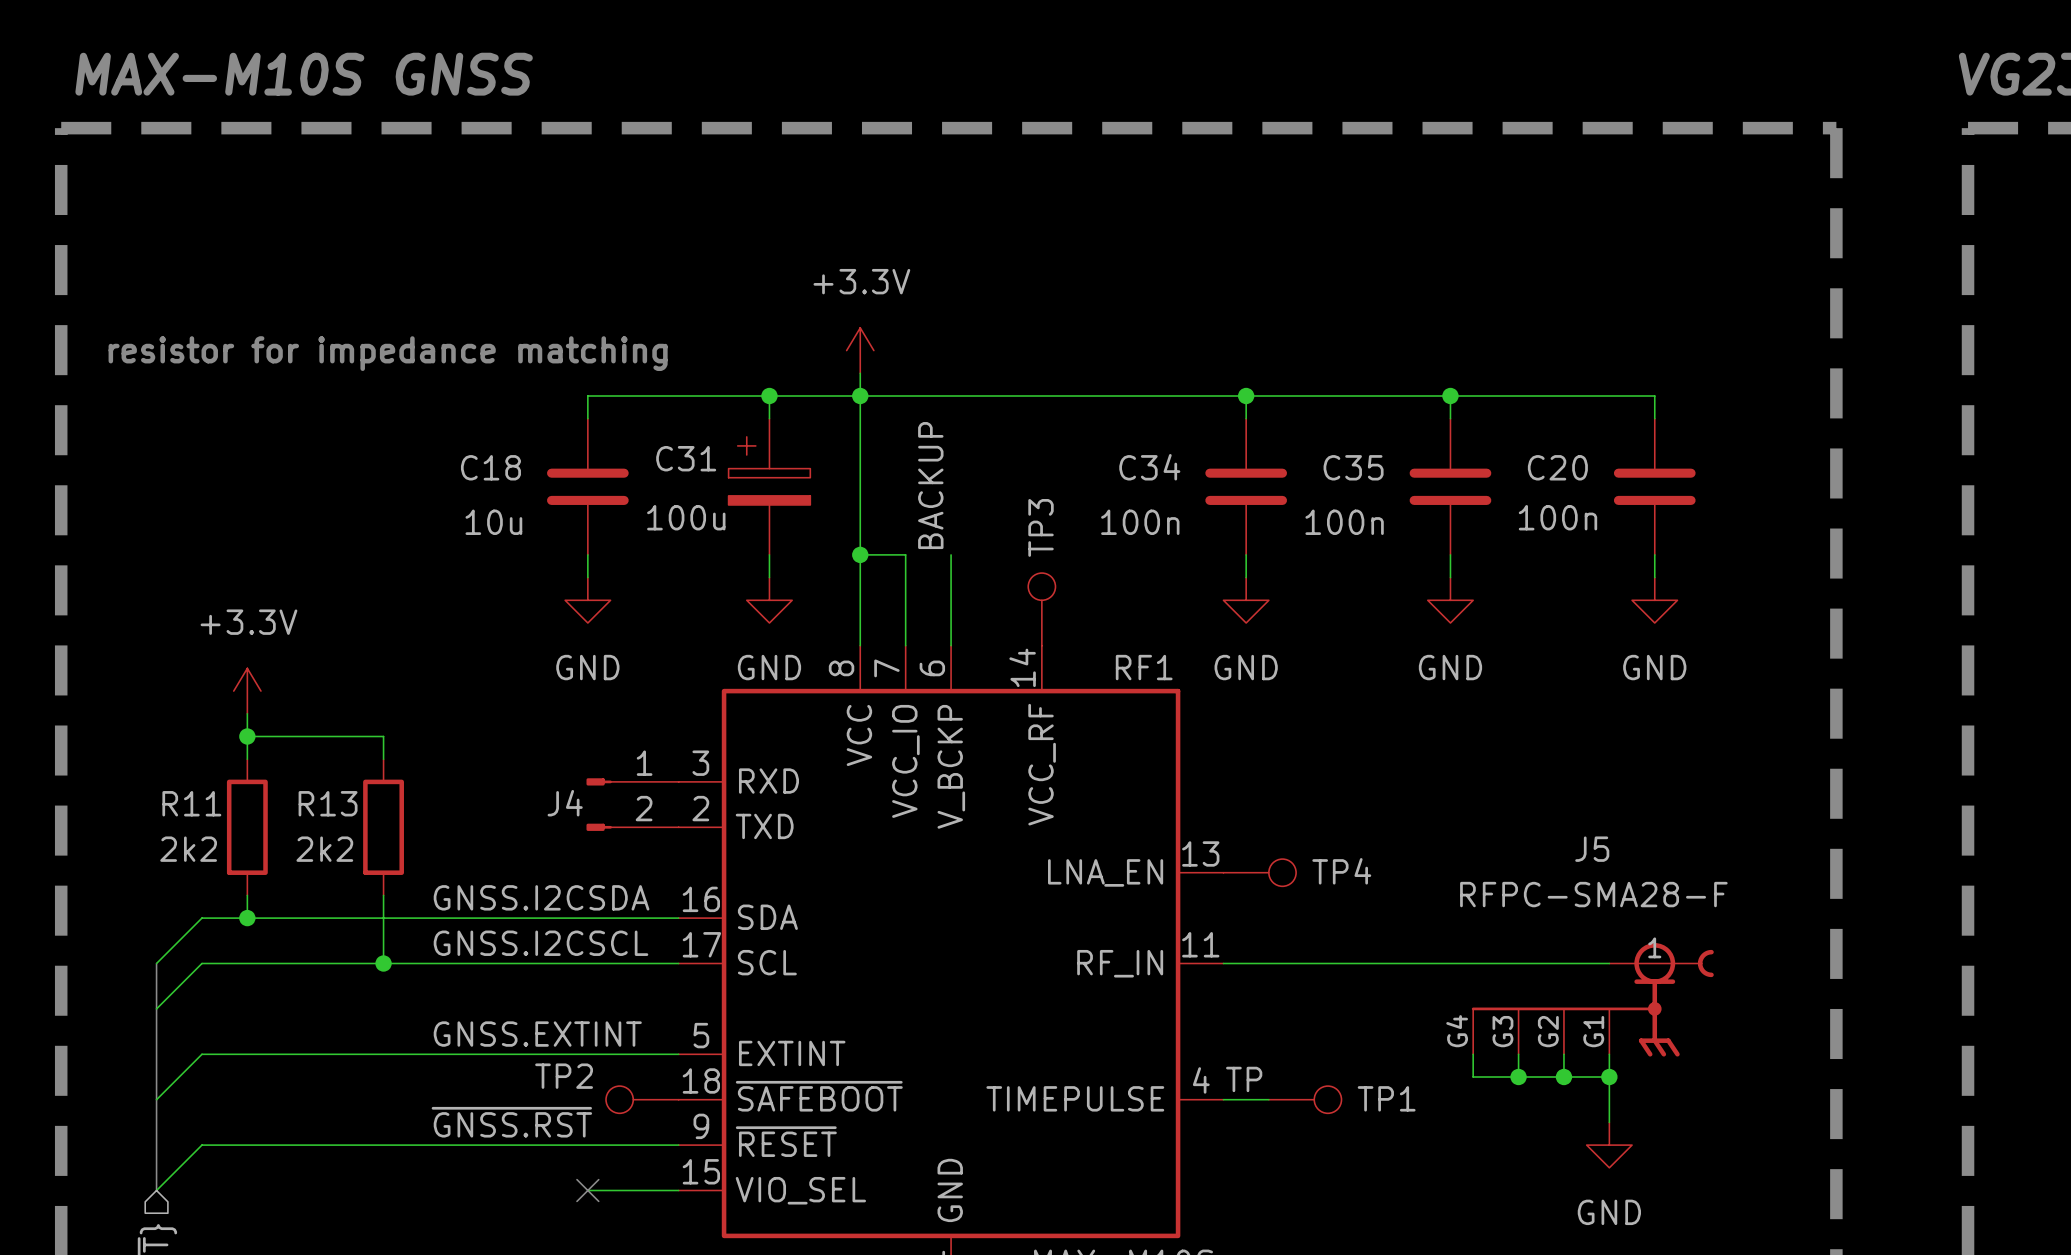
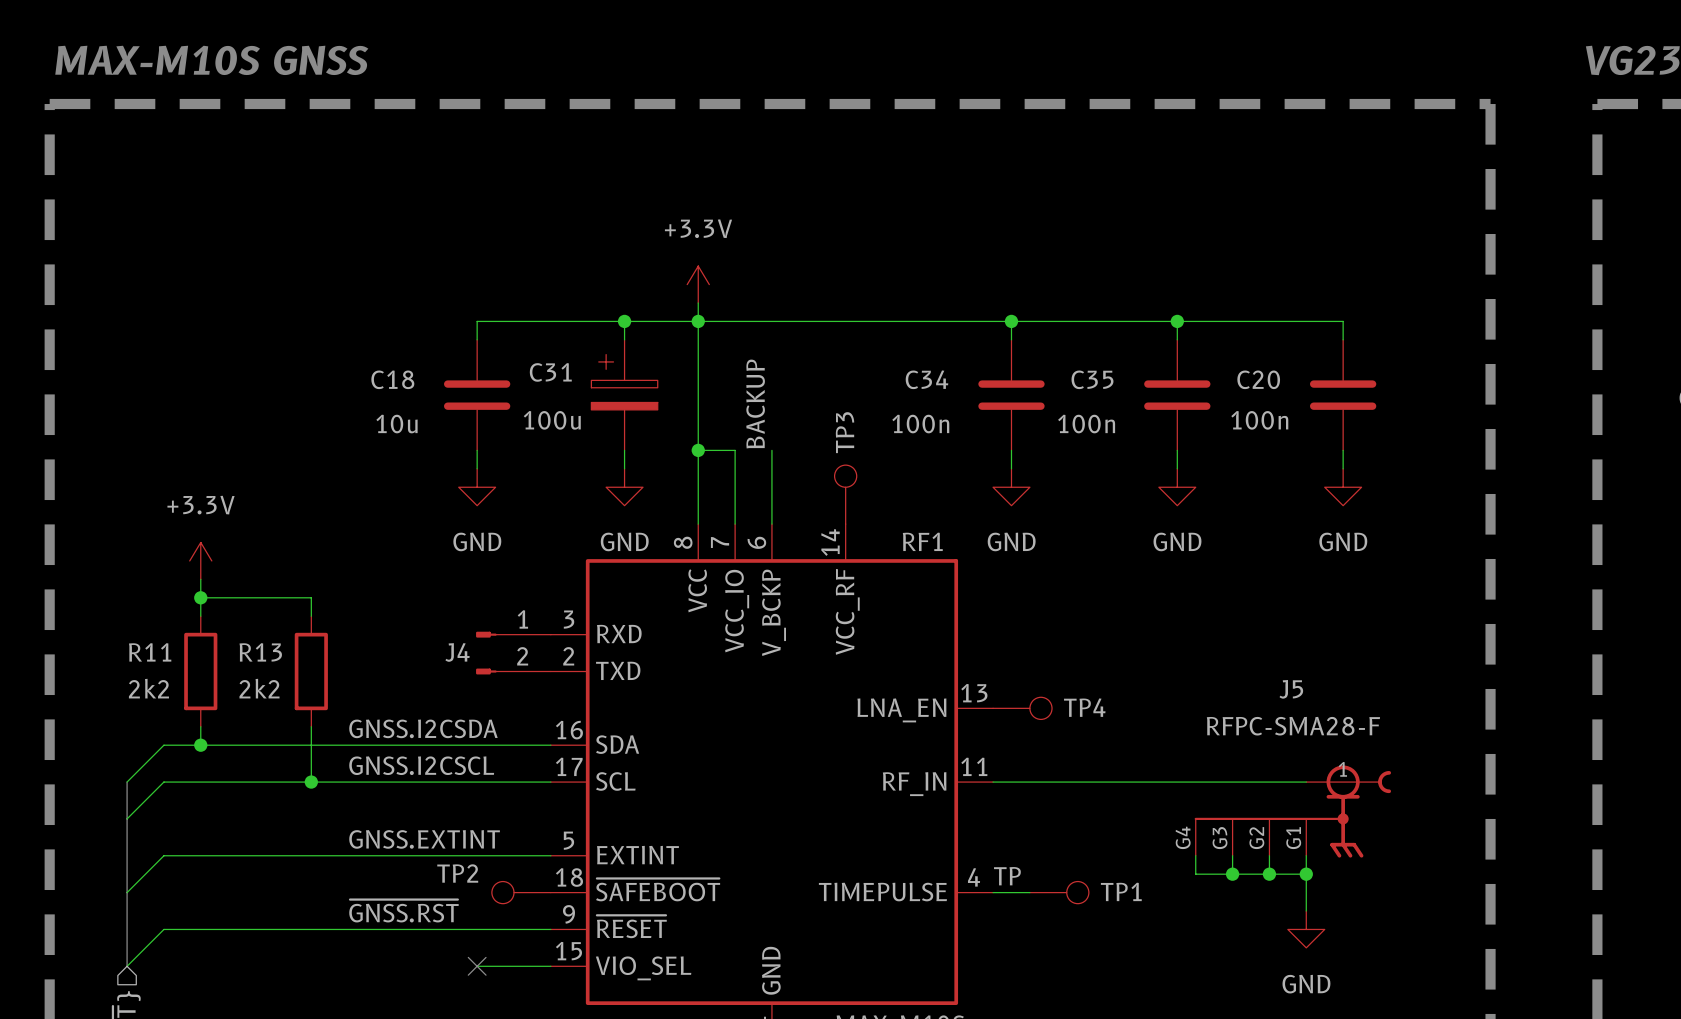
text: resistor for impedance matching (388, 353) -> none

